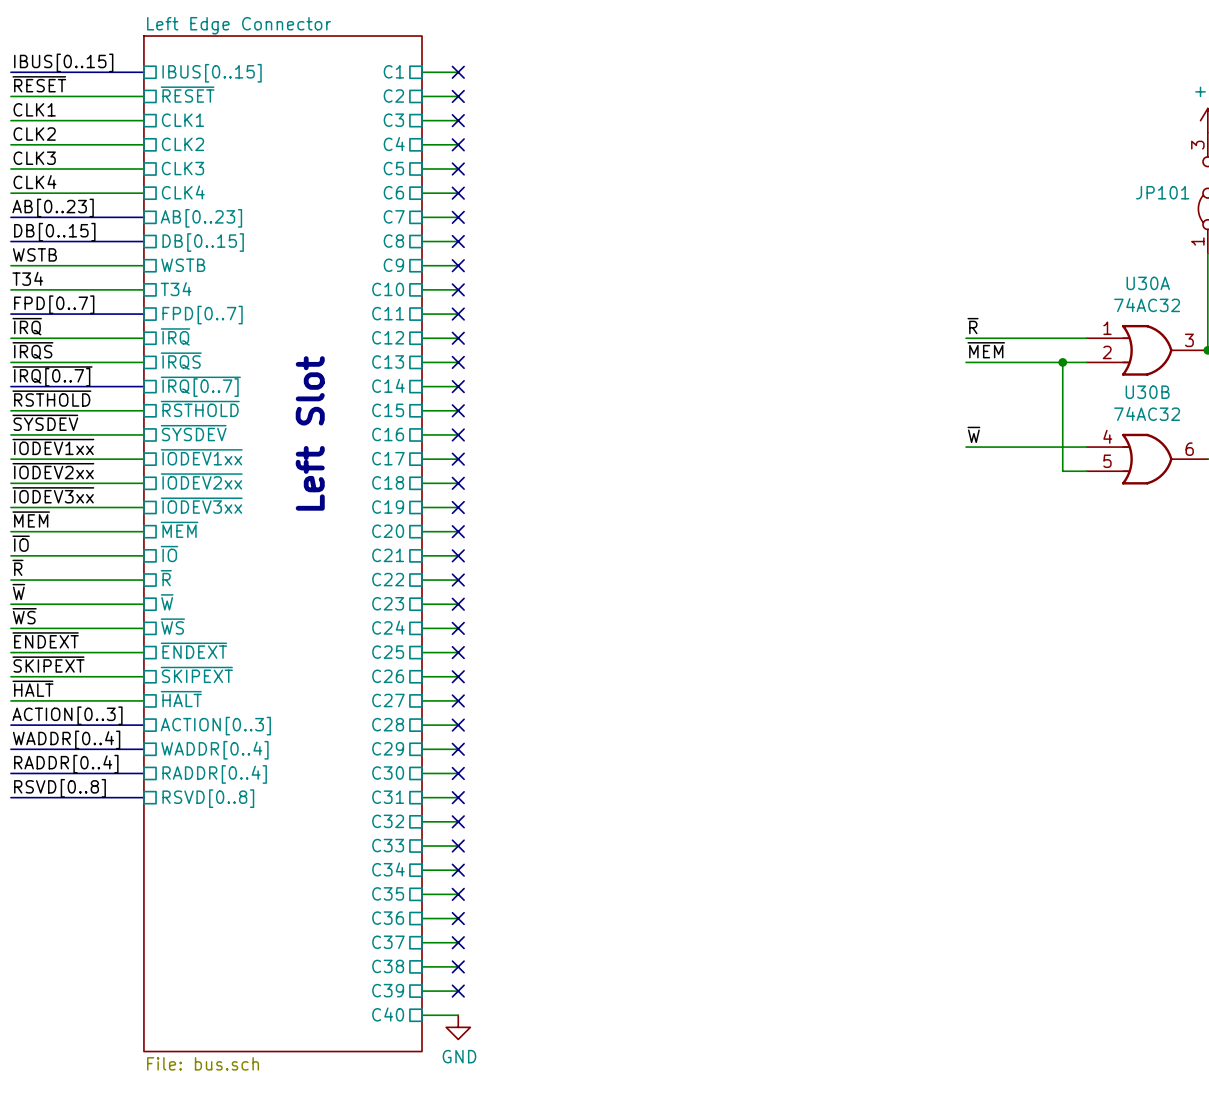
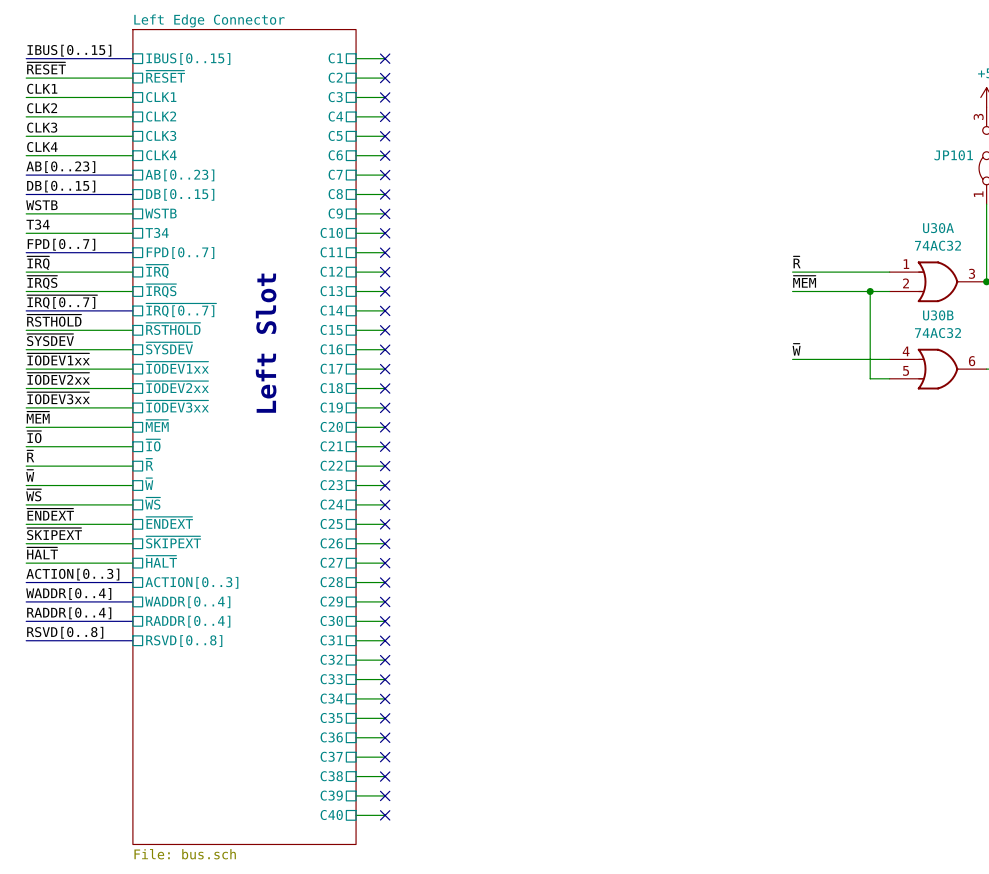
no-connect mark: none -> (385, 815)
power symbol: GND (458, 1027) -> none

